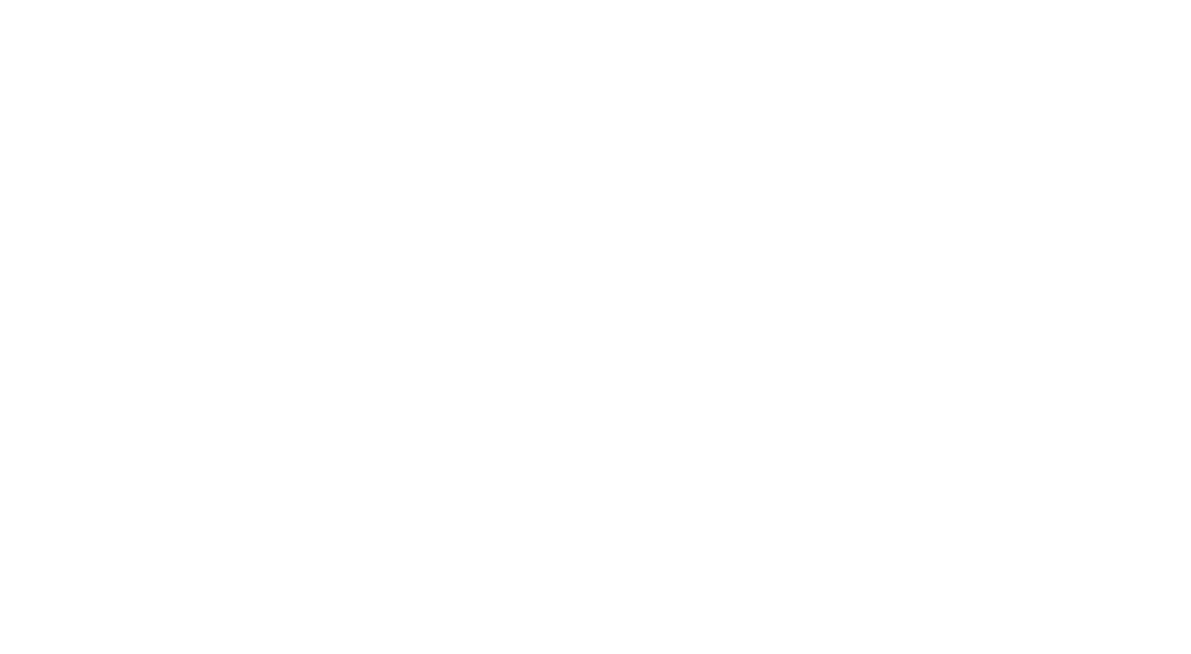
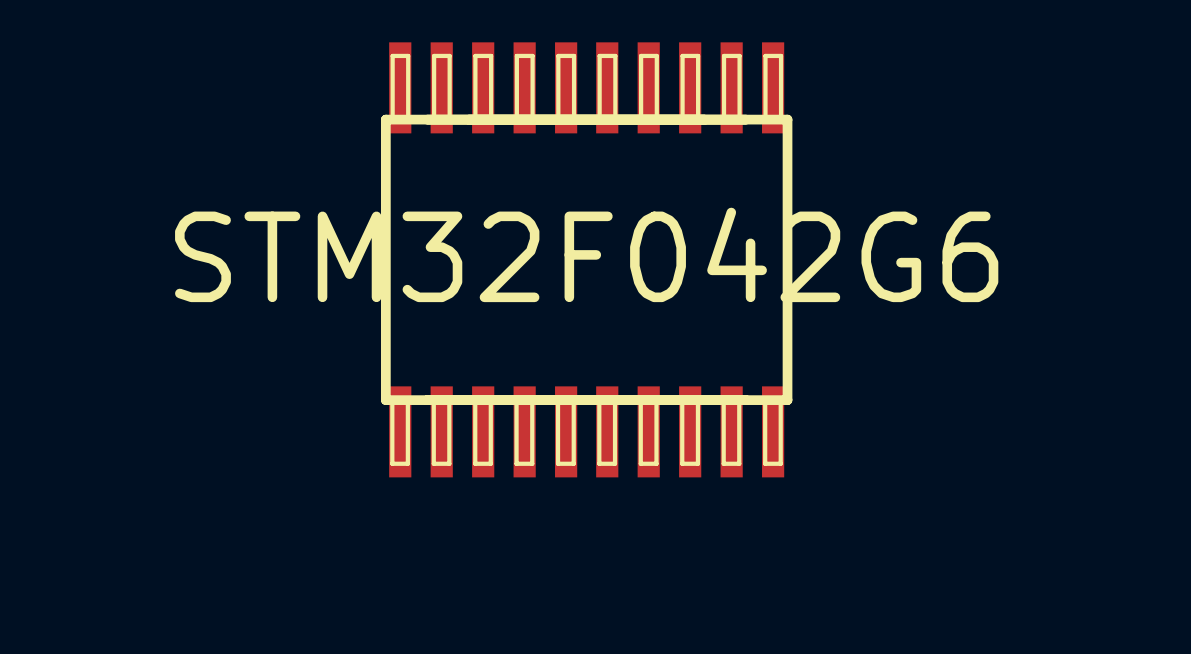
part: none -> STM32F042G6 (586, 259)

